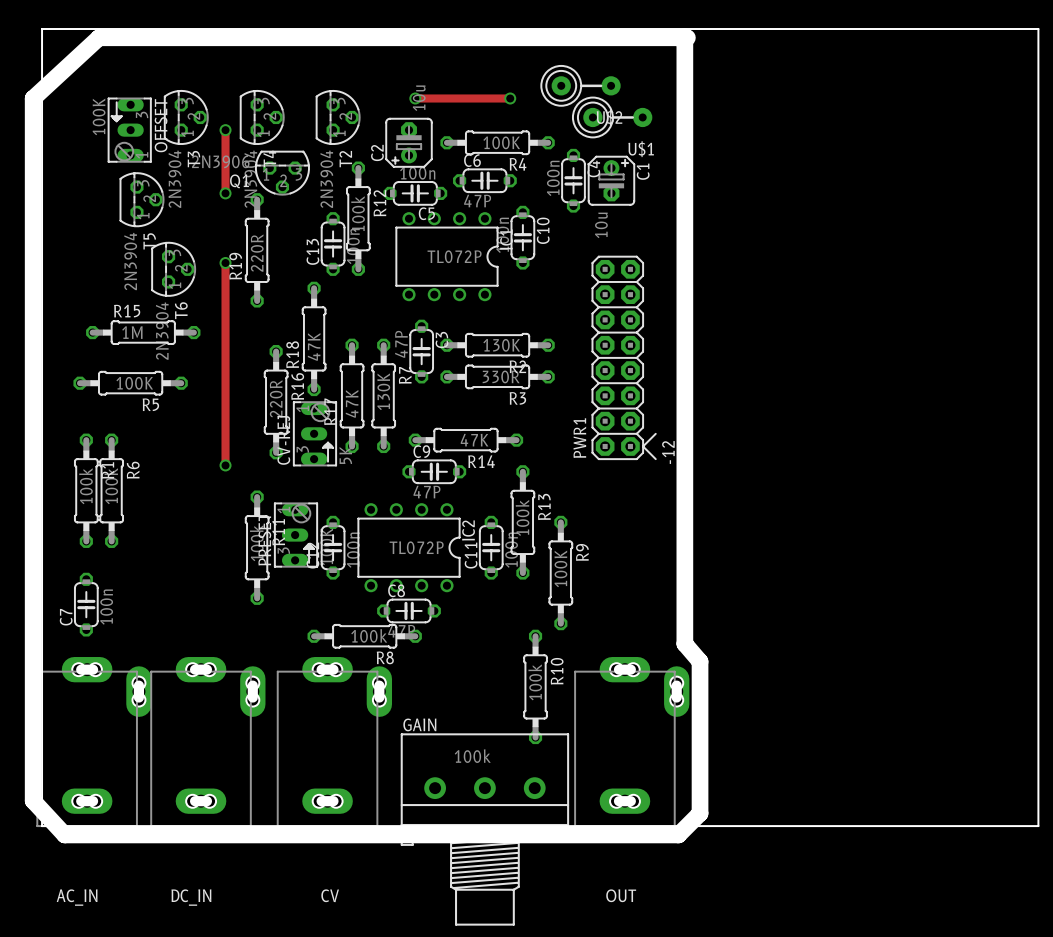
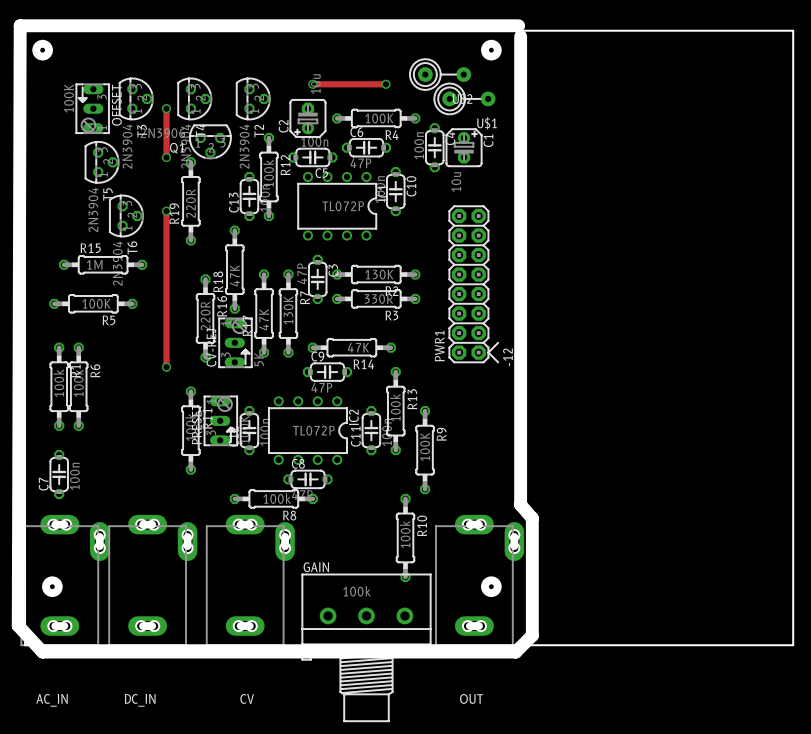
board edge: (687, 37) (98, 37) (33, 98) (33, 800) -> (518, 25) (20, 25) (18, 625)
round board edge: none -> [32, 39, 53, 61]
round board edge: none -> [481, 39, 502, 61]
round board edge: none -> [42, 576, 63, 598]
round board edge: none -> [481, 576, 502, 598]

